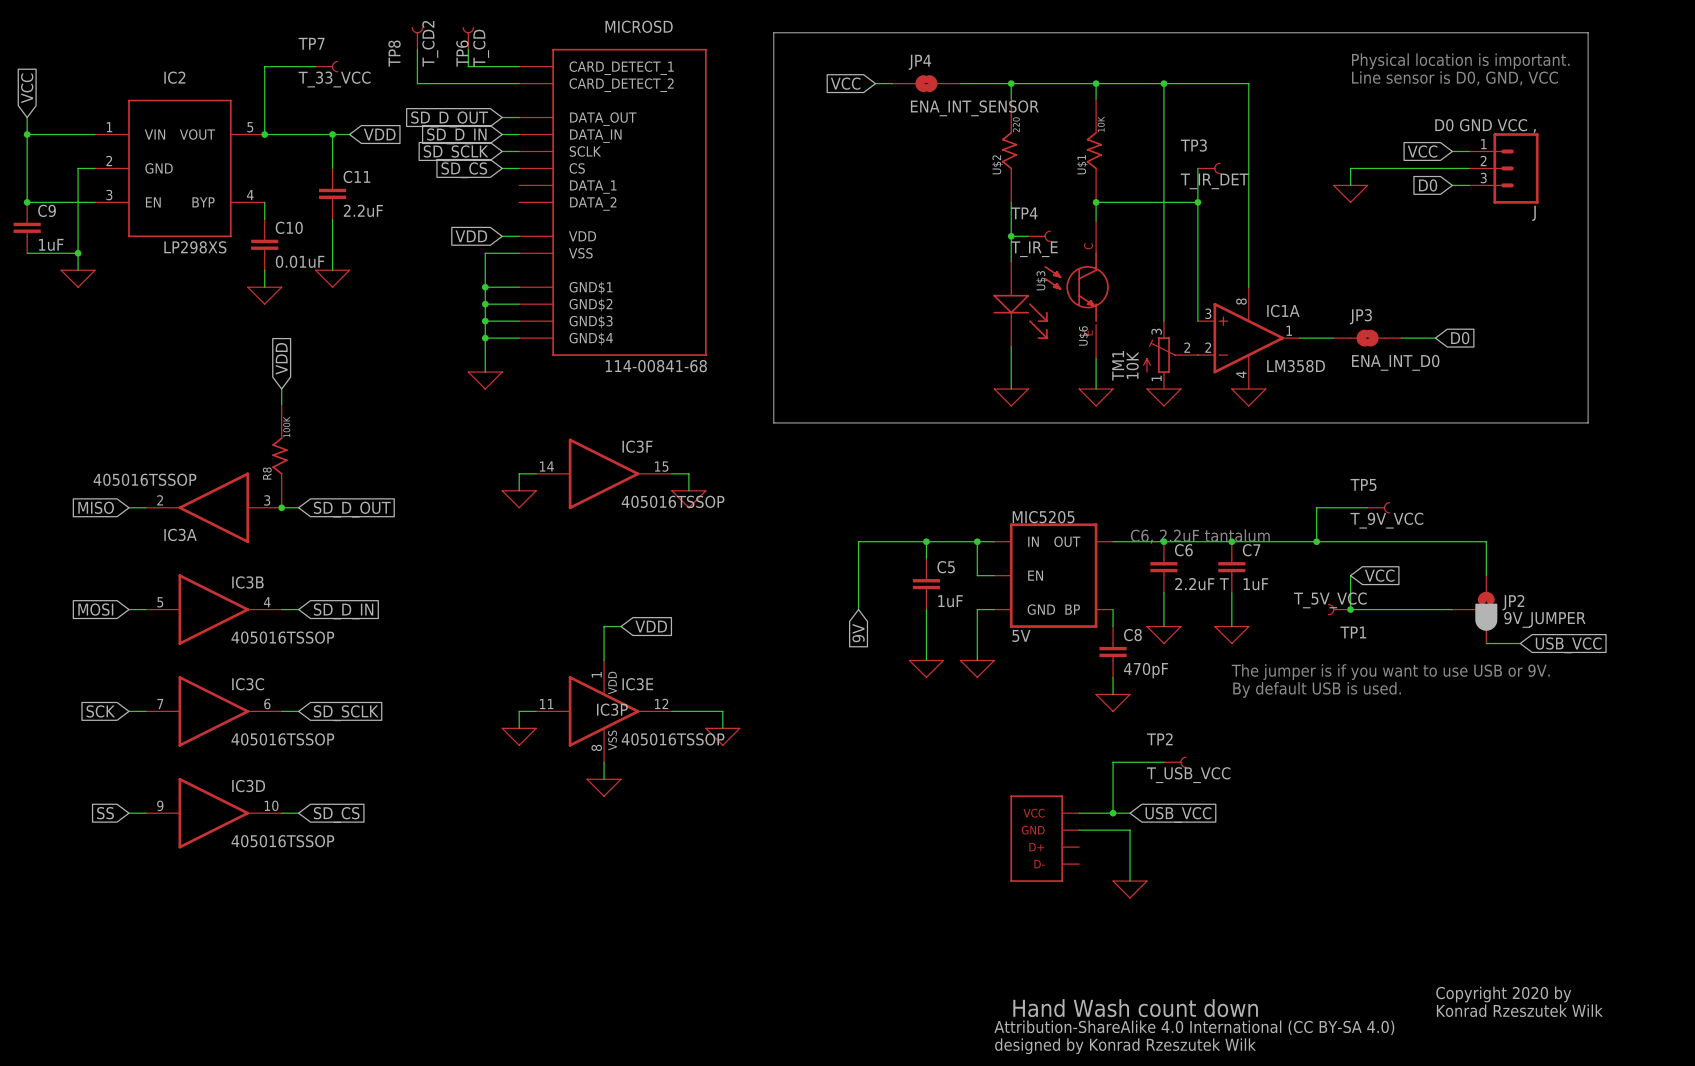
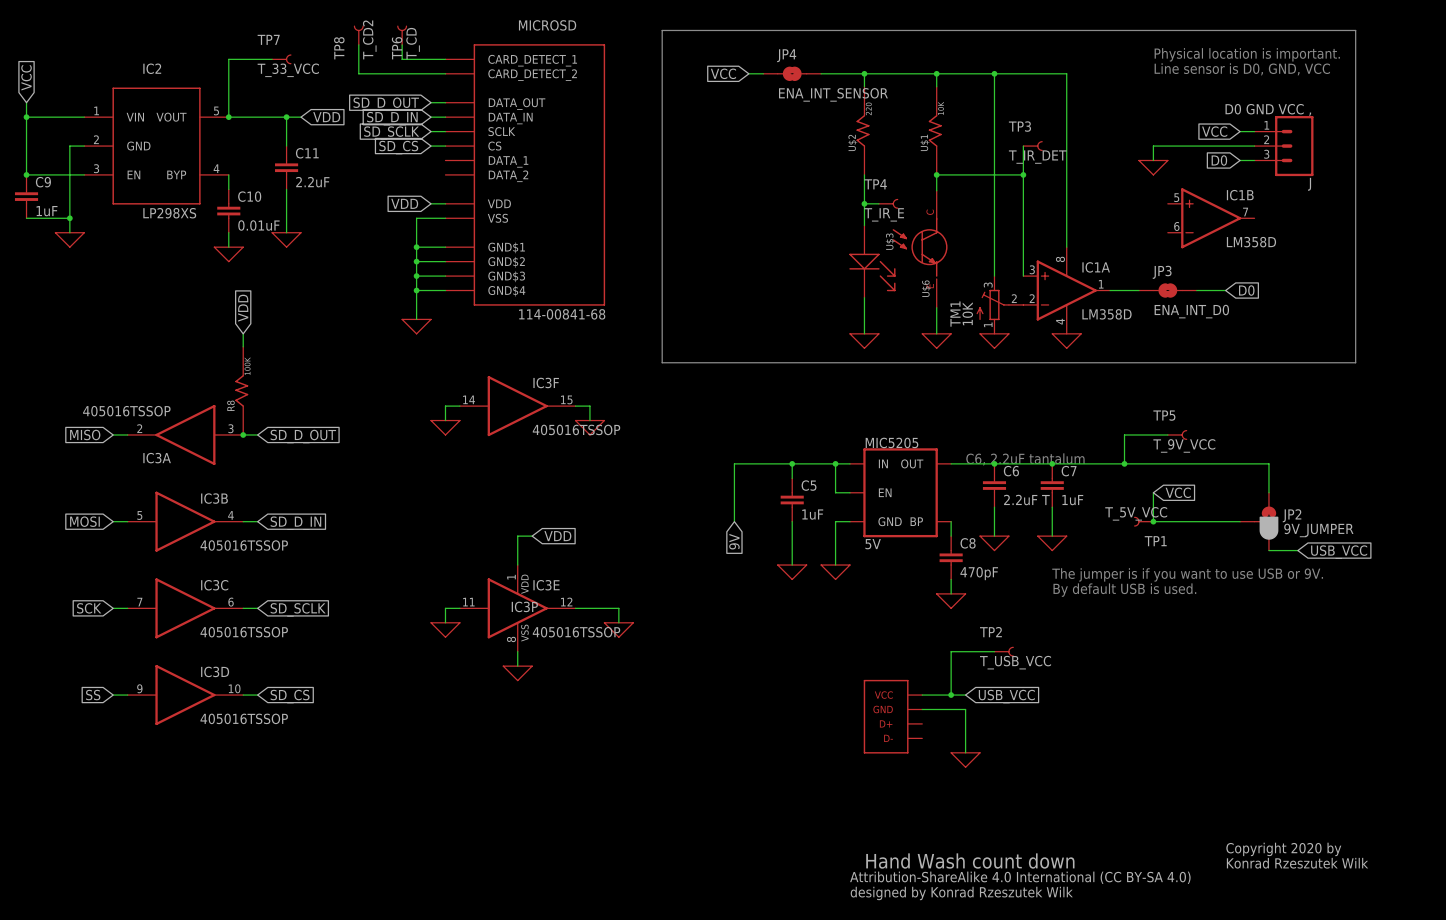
IC1B: none -> LM358D (1211, 218)

